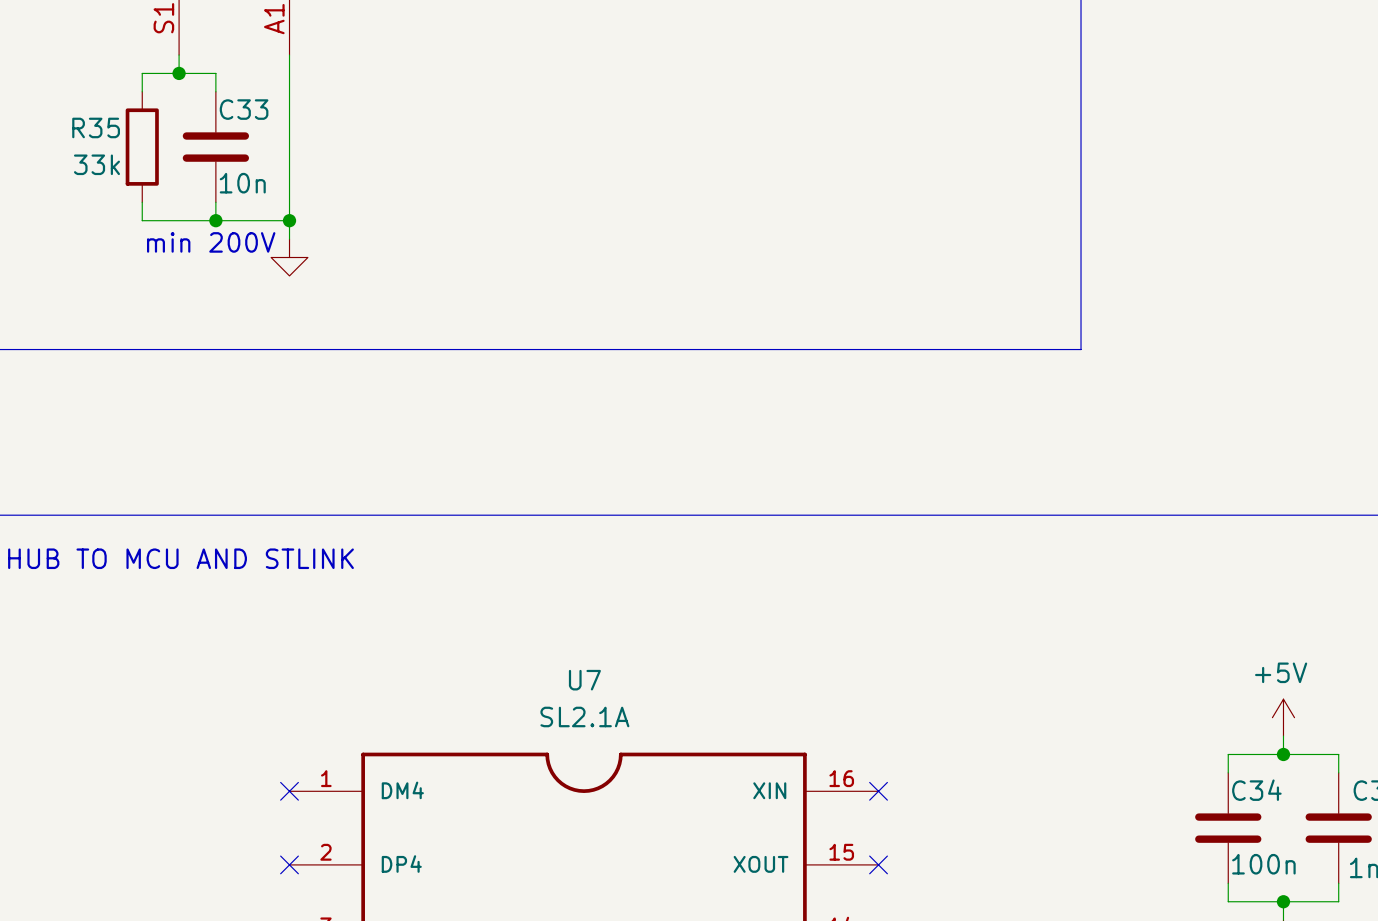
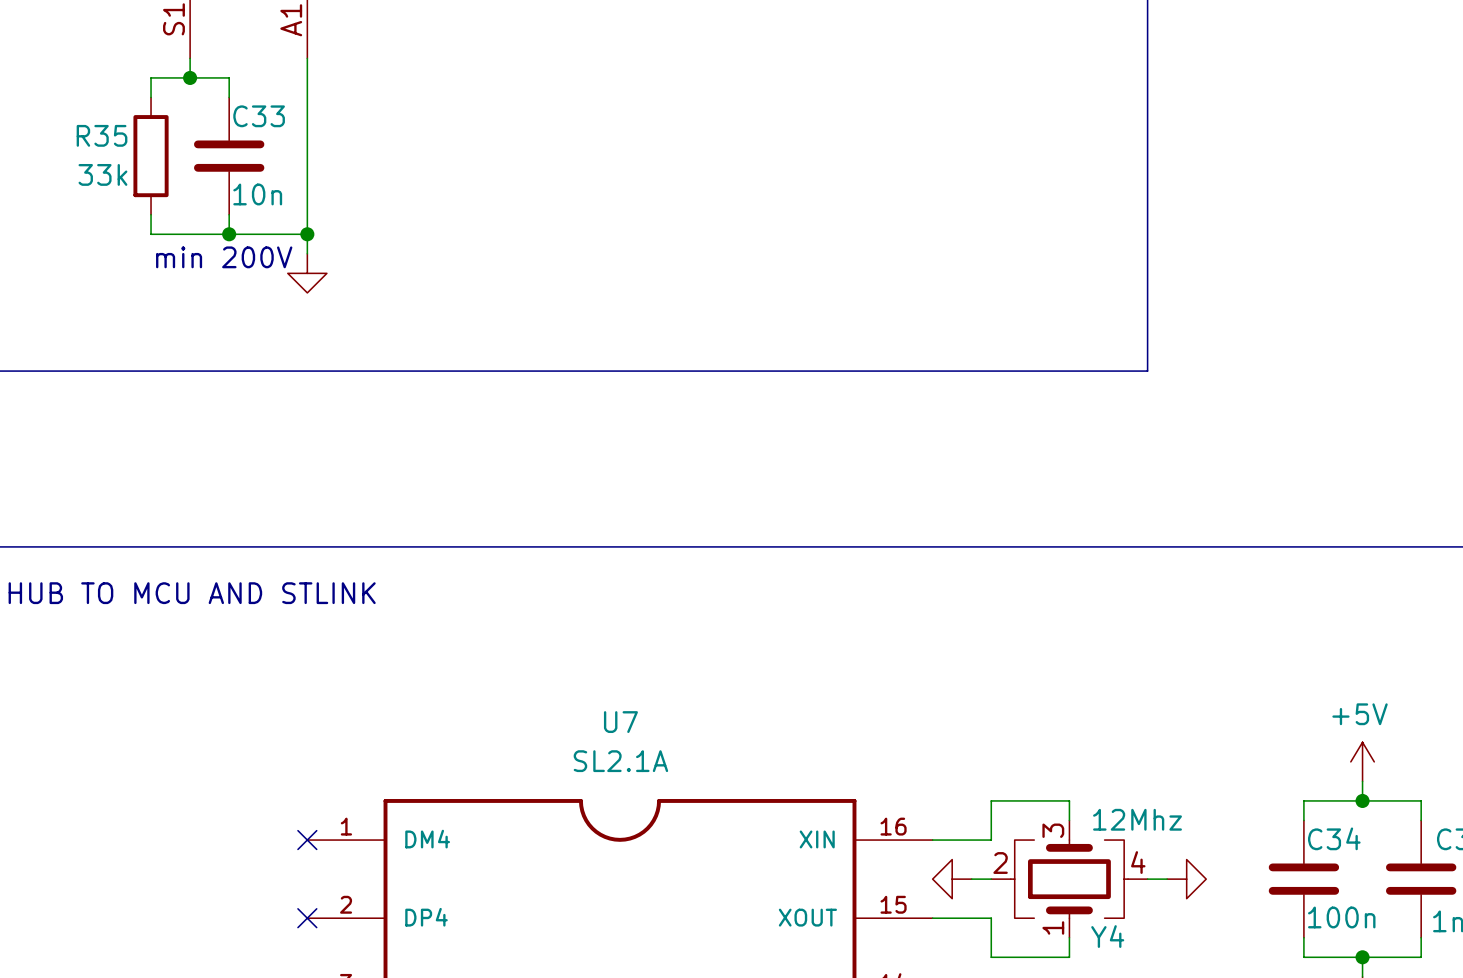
wire: none -> (1069, 820) (1069, 800) (991, 800) (991, 840) (932, 840)
no-connect mark: (878, 791) -> none
power symbol: none -> (952, 879)
wire: none -> (971, 879) (991, 879)
Y4: none -> 12Mhz (1069, 879)
wire: none -> (1147, 879) (1167, 879)
power symbol: none -> (1186, 879)
wire: none -> (932, 918) (991, 918) (991, 957) (1069, 957) (1069, 937)
no-connect mark: (878, 864) -> none

